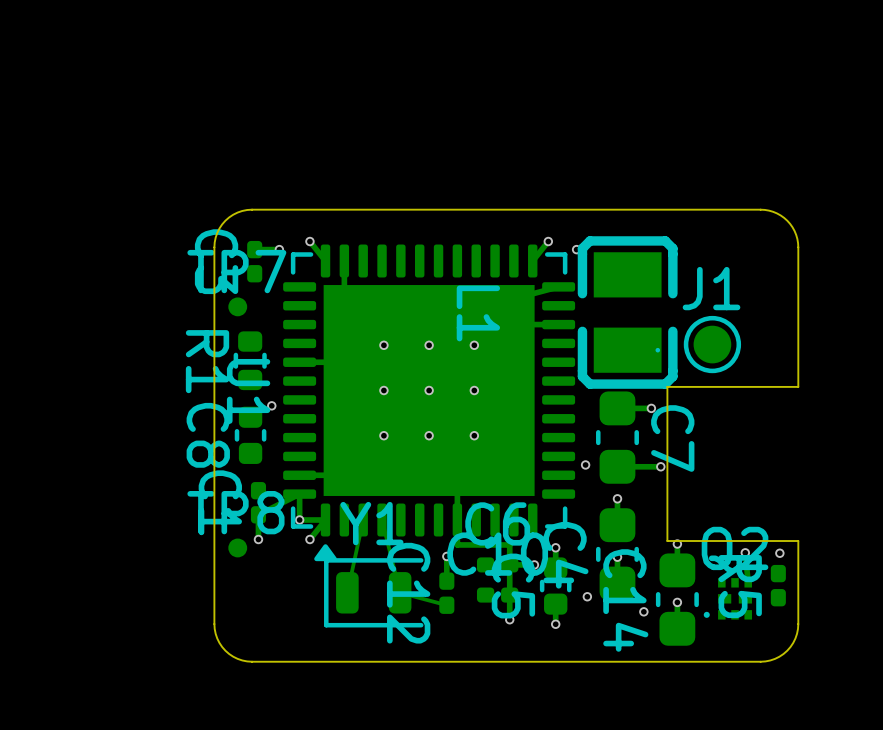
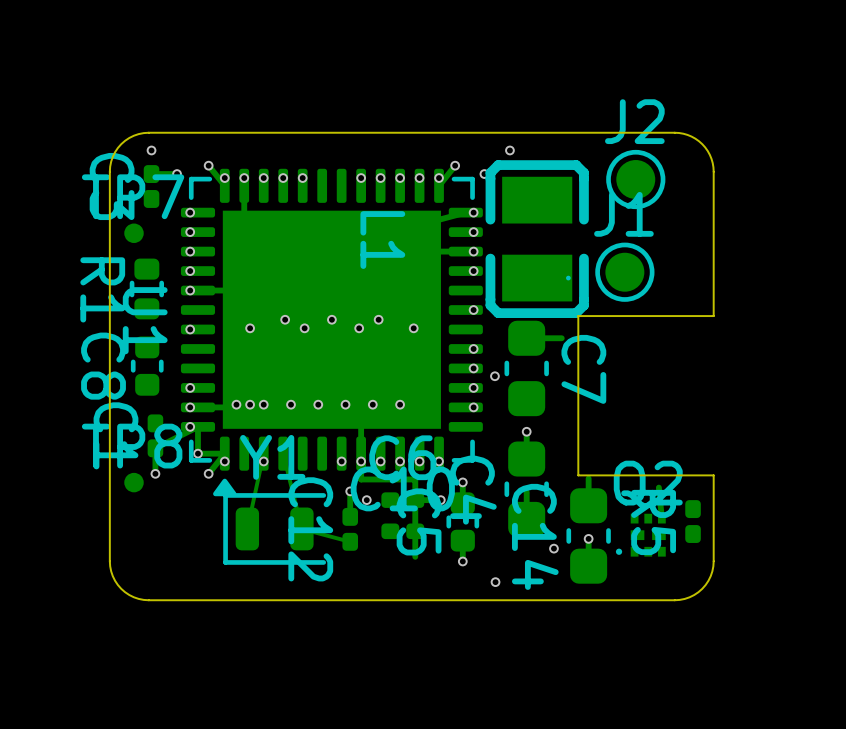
via: none -> (151, 150)
via: none -> (509, 150)
via: none -> (224, 178)
via: none -> (244, 178)
via: none -> (263, 178)
via: none -> (283, 178)
via: none -> (302, 178)
via: none -> (361, 178)
via: none -> (380, 178)
via: none -> (400, 178)
via: none -> (419, 178)
via: none -> (439, 178)
J2: none -> (635, 179)
via: none -> (190, 212)
via: none -> (473, 212)
via: none -> (190, 232)
via: none -> (473, 232)
via: none -> (190, 251)
via: none -> (473, 251)
via: none -> (190, 271)
via: none -> (473, 271)
via: (383, 345) -> none
via: (429, 345) -> none
via: (474, 345) -> none
via: none -> (190, 290)
via: none -> (473, 310)
via: none -> (250, 328)
via: none -> (304, 328)
via: none -> (359, 328)
via: none -> (413, 328)
via position: (271, 405) -> (190, 329)
via: (651, 408) -> none
via: none -> (473, 348)
via: (383, 435) -> none
via: (429, 435) -> none
via: (474, 435) -> none
via: none -> (473, 368)
via: none -> (494, 376)
via: none -> (190, 387)
via: none -> (473, 387)
via: (585, 464) -> none
track: (660, 466) (617, 466) -> none
via: (660, 466) -> none
via: none -> (236, 404)
via: none -> (250, 404)
via: none -> (263, 404)
via: none -> (291, 404)
via: none -> (318, 404)
via: none -> (345, 404)
via: none -> (372, 404)
via: none -> (400, 404)
via: none -> (190, 407)
via: none -> (473, 407)
via: none -> (190, 426)
via: none -> (224, 461)
via: none -> (263, 461)
via: none -> (341, 461)
via: none -> (361, 461)
via: none -> (380, 461)
via: none -> (400, 461)
via: none -> (419, 461)
via: none -> (439, 461)
via: (677, 544) -> none
via: (745, 552) -> none
via: (779, 553) -> none
via: (617, 557) -> none
via: none -> (366, 500)
via: (587, 596) -> none
via: (509, 619) -> none
via: none -> (495, 582)

